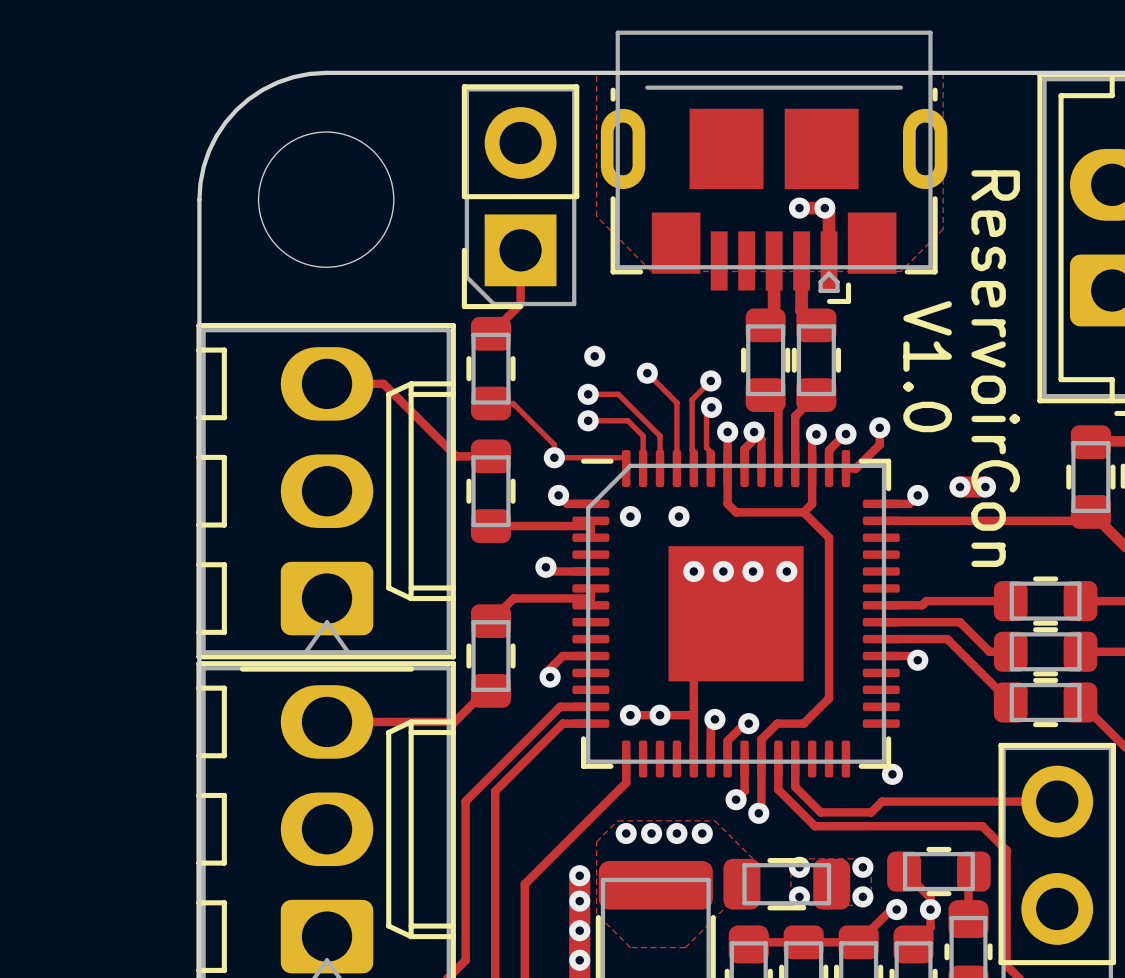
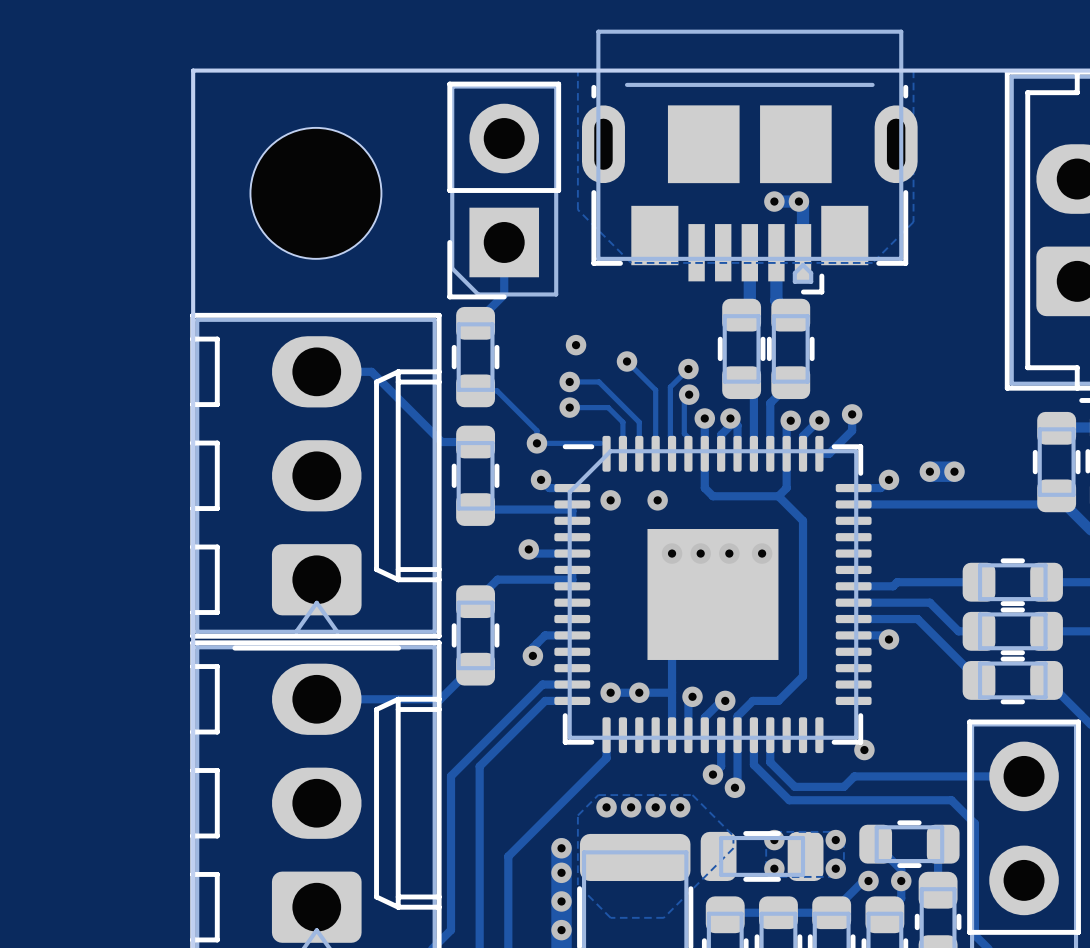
board edge: (326, 72) (309, 73) (277, 82) (249, 99) (236, 109) (216, 136) (209, 151) (200, 183) (199, 199) -> (315, 70) (193, 70) (193, 193)
text: V1.0 (927, 366) -> none
text: ReservoirCon (995, 368) -> none

